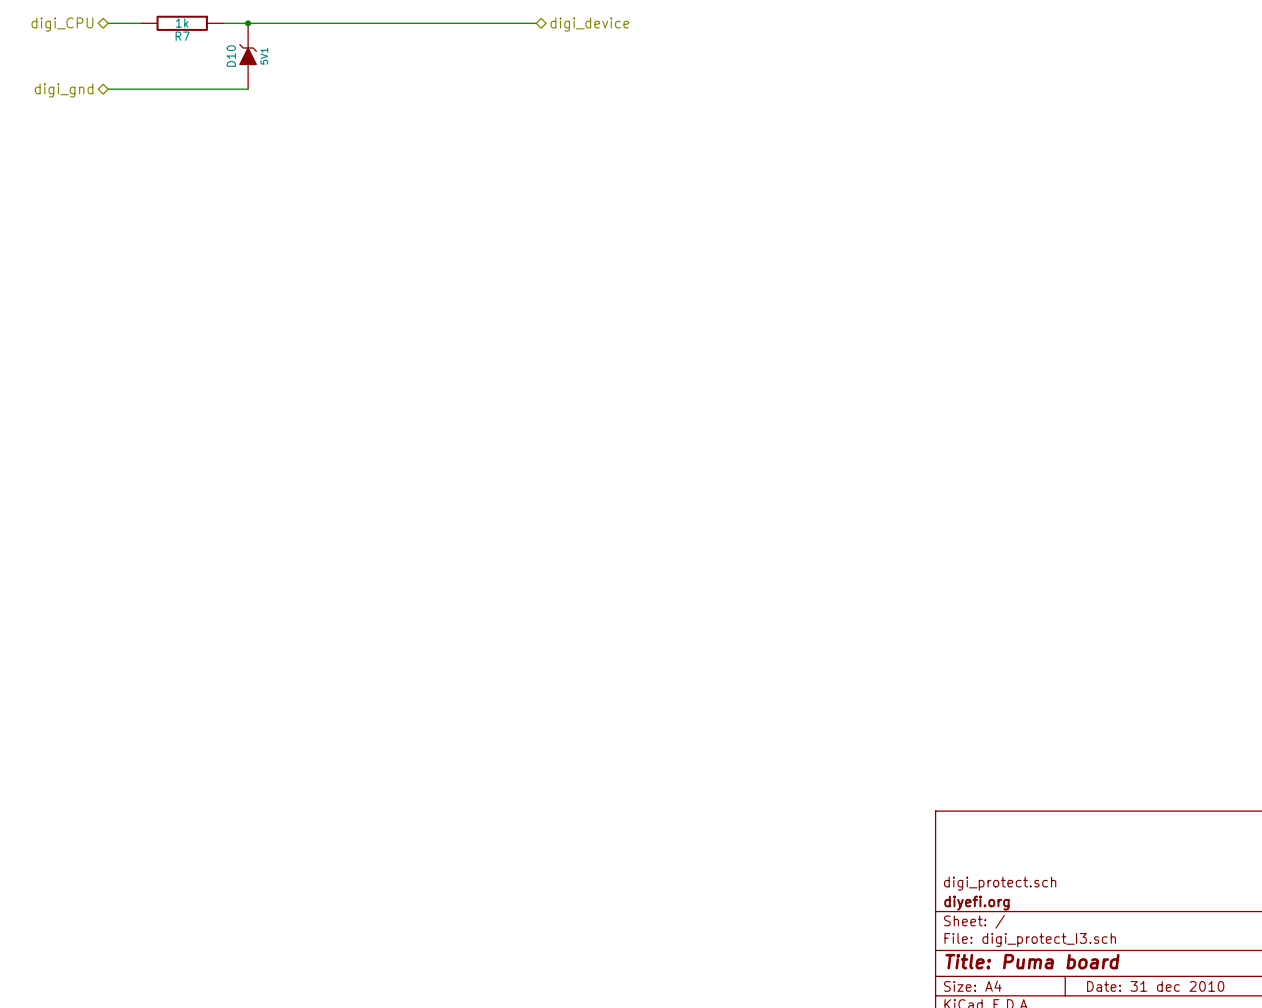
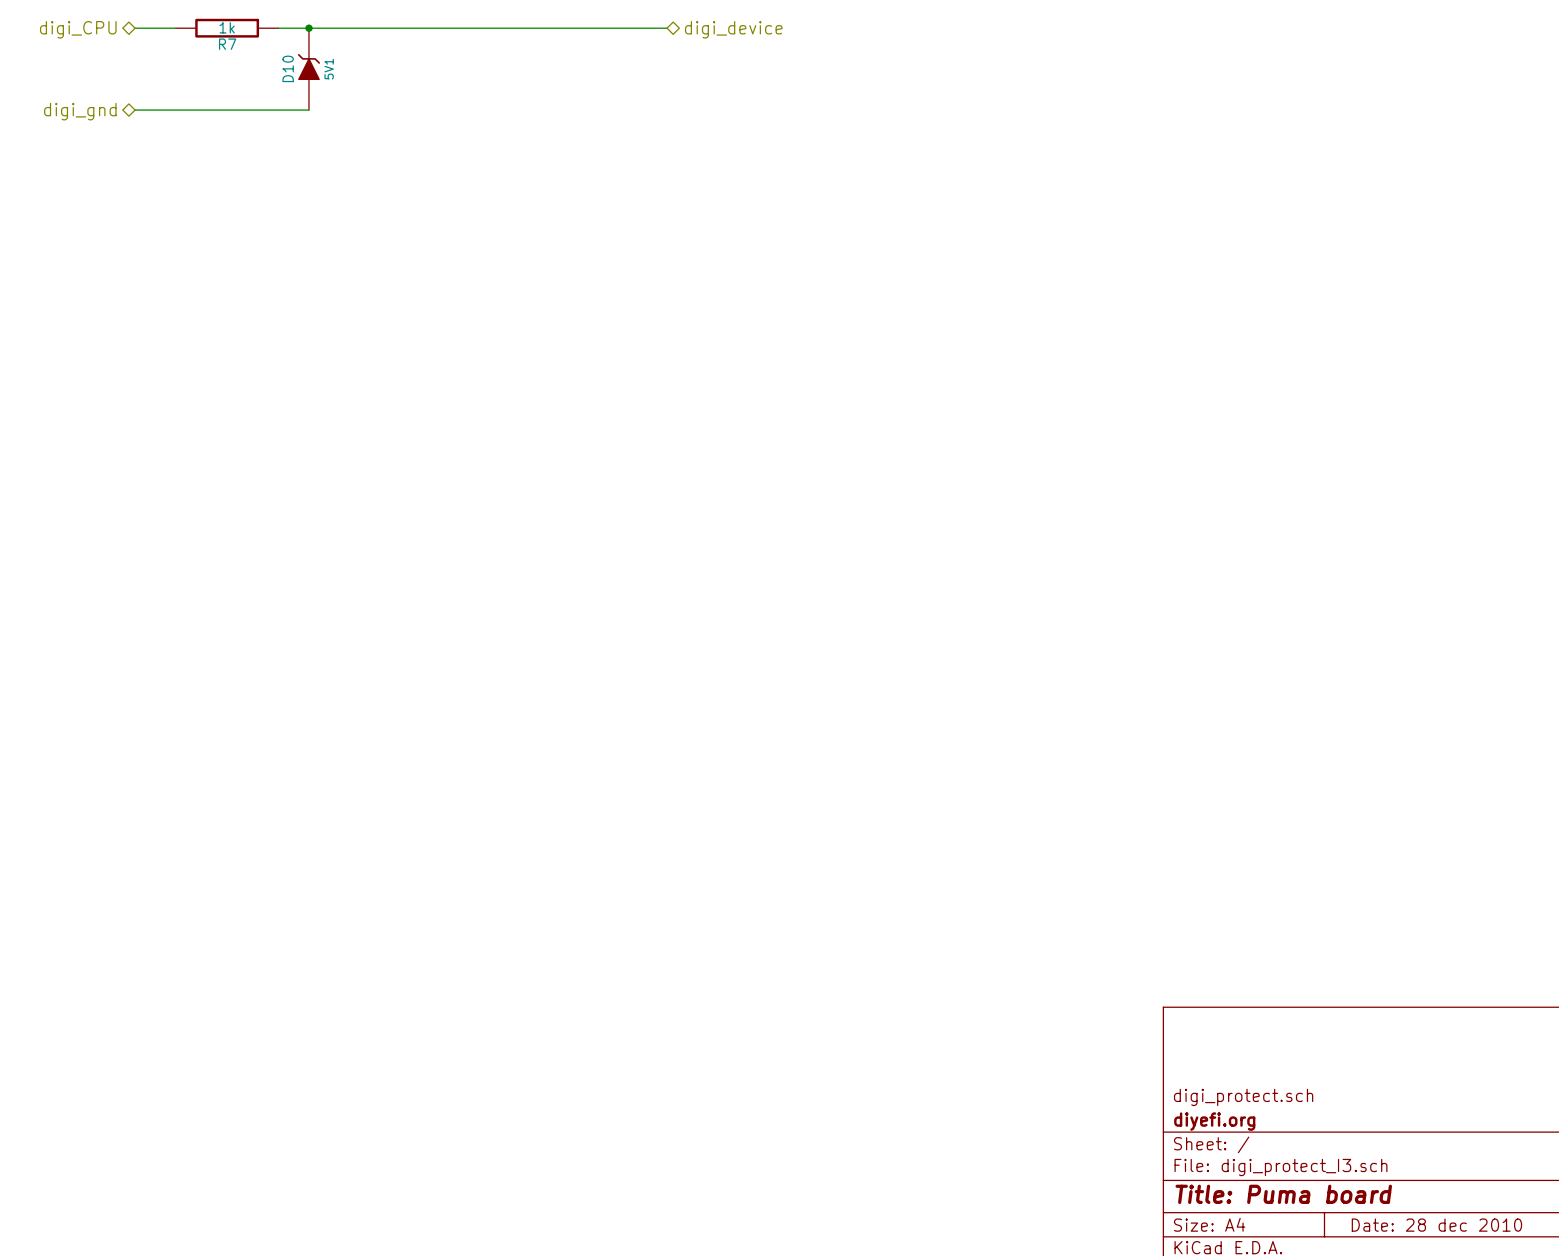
title block: Date: 31 dec 2010 (1155, 986) -> Date: 28 dec 2010 (1436, 1225)

